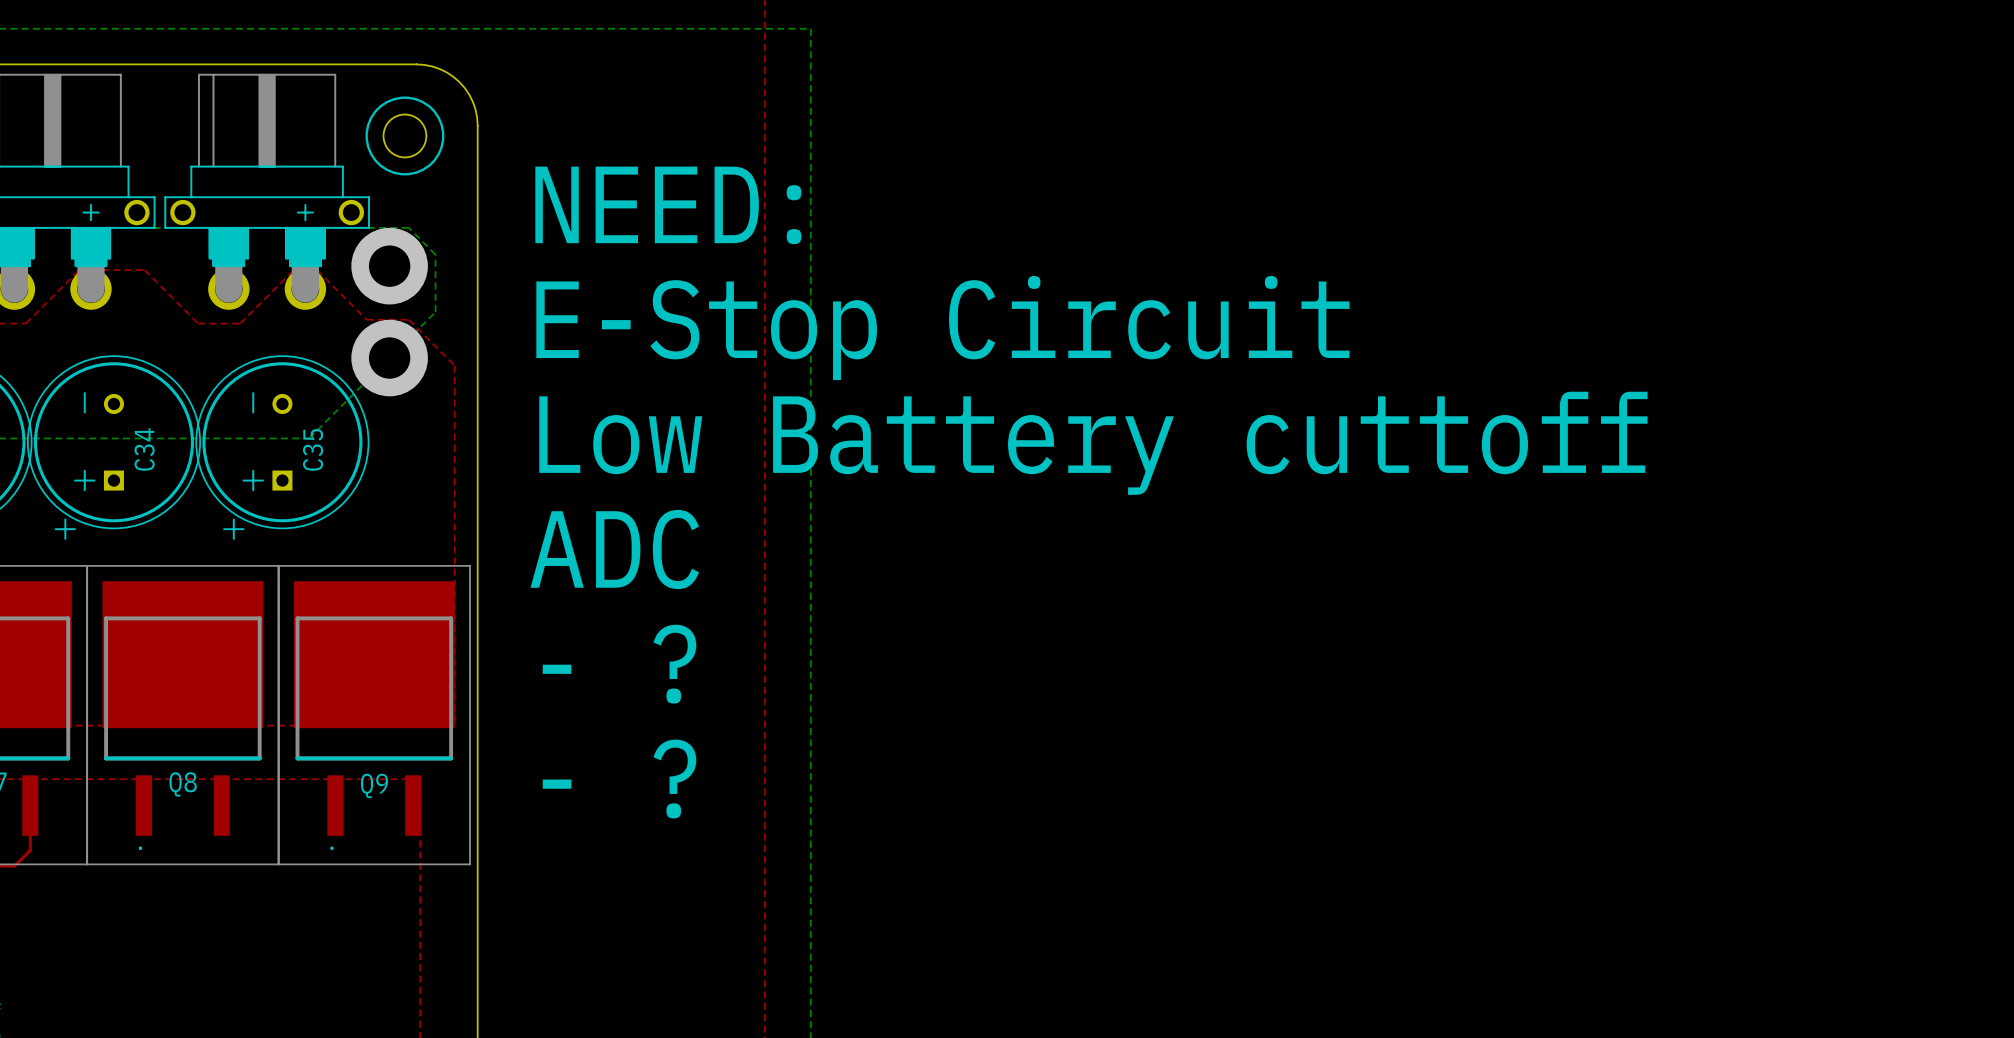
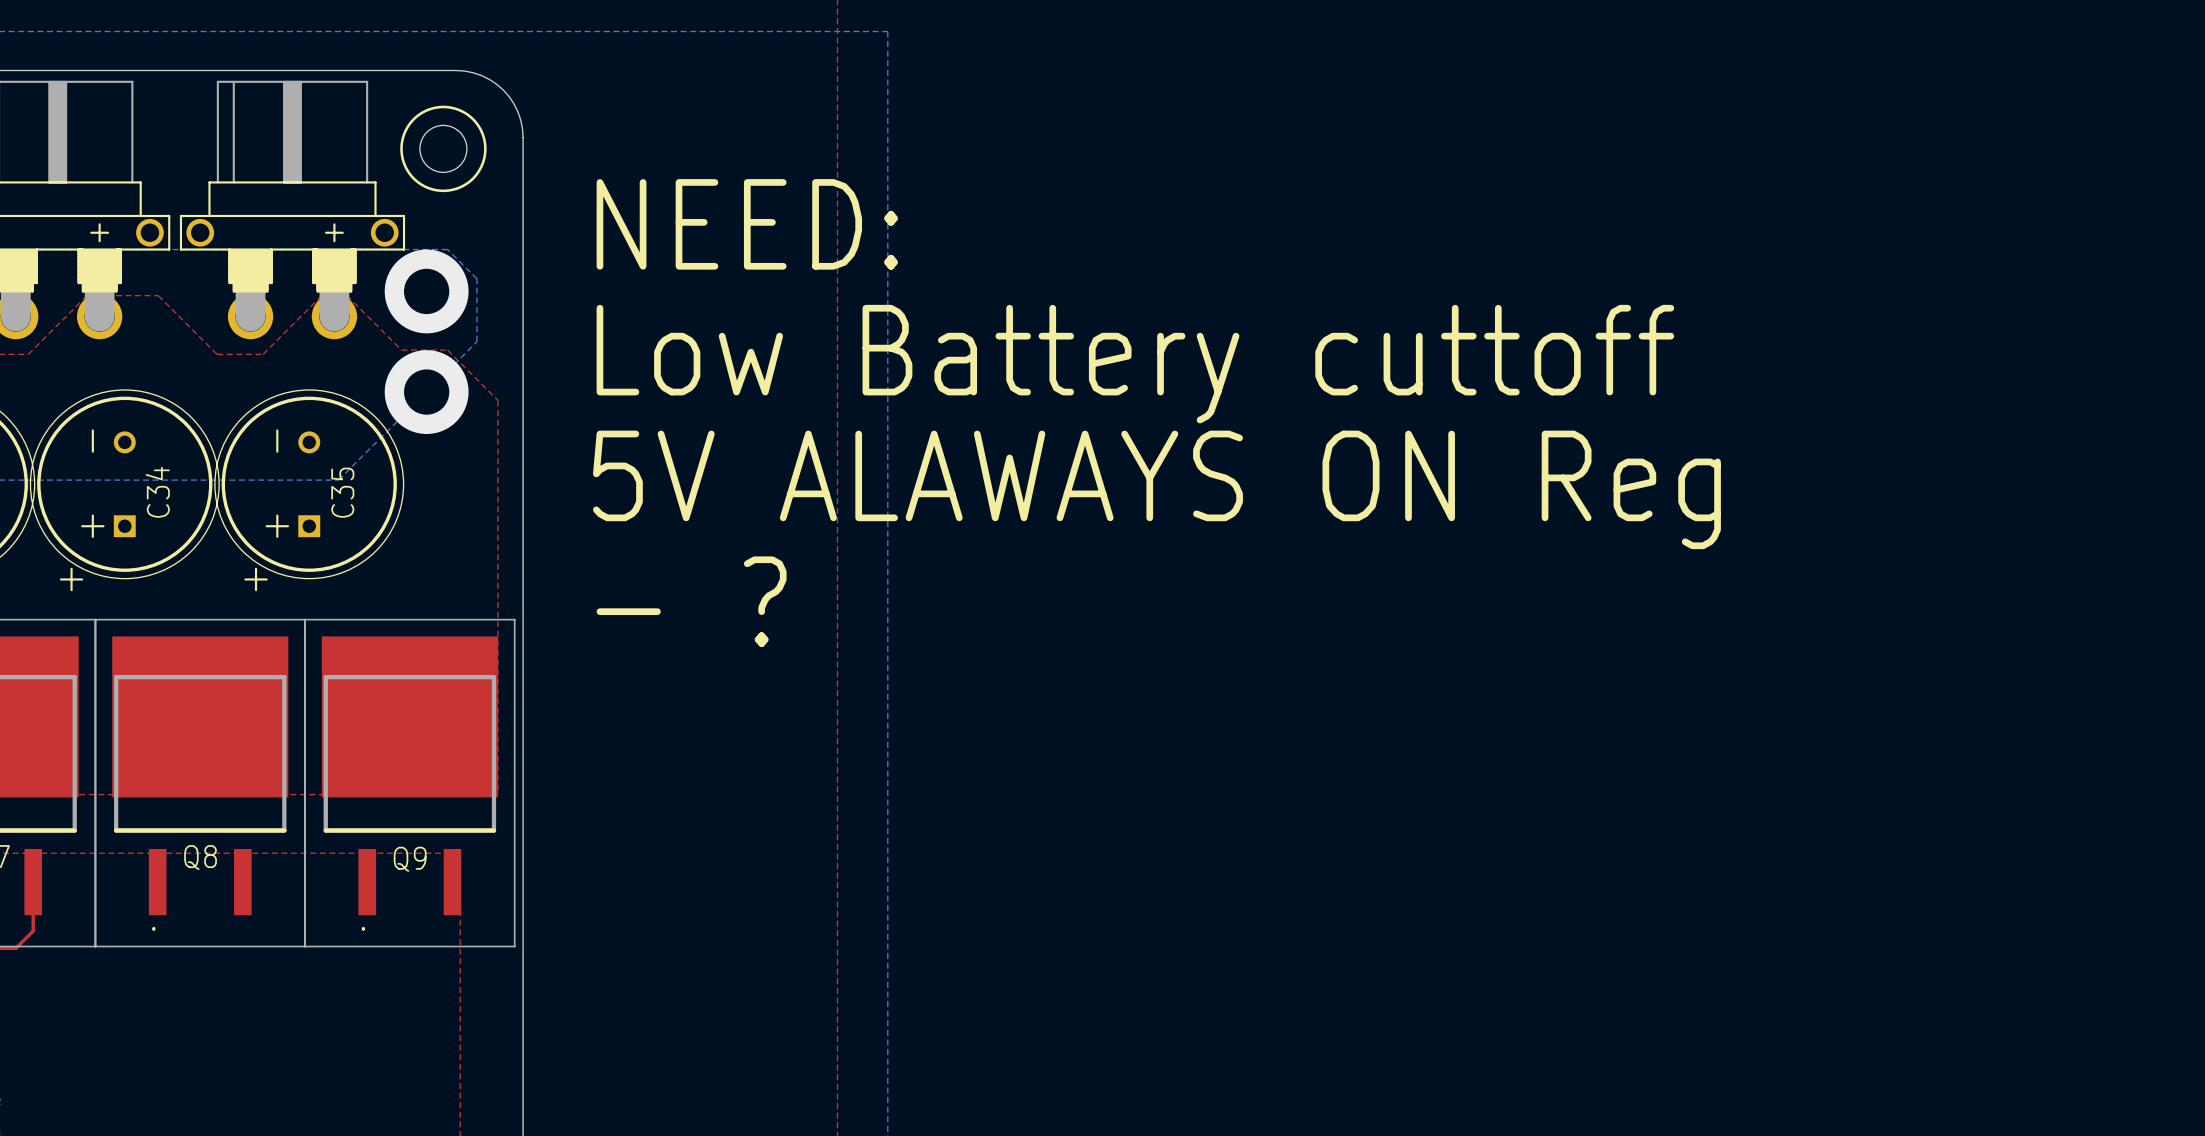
text: E-Stop Circuit (942, 327) -> Low Battery cuttoff (1135, 364)
text: Low Battery cuttoff (1093, 443) -> 5V ALAWAYS ON Reg (1156, 489)
text: ADC (614, 549) -> - ? (691, 601)
text: - ? (619, 664) -> none
text: - ? (619, 779) -> none

